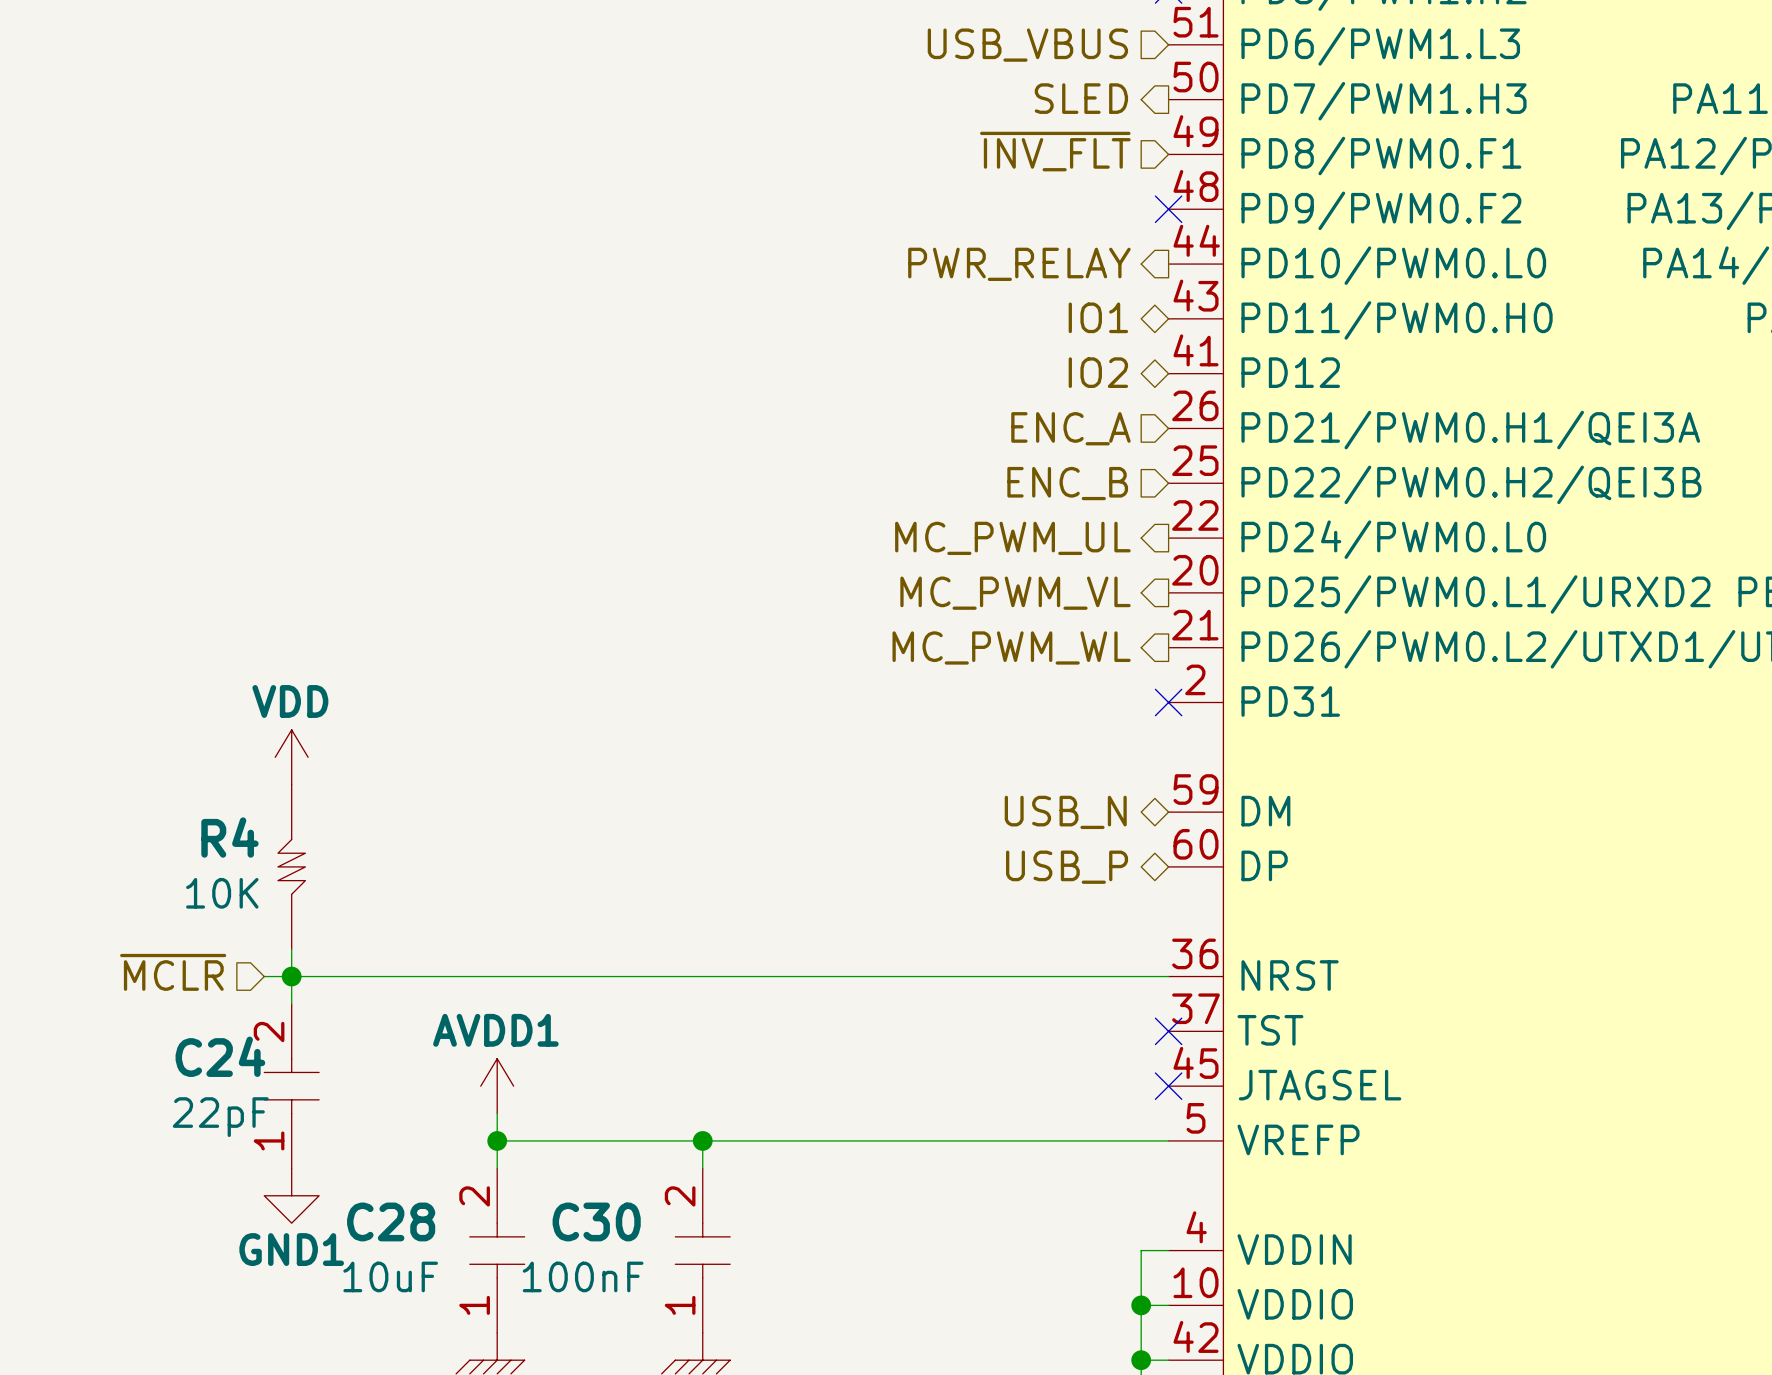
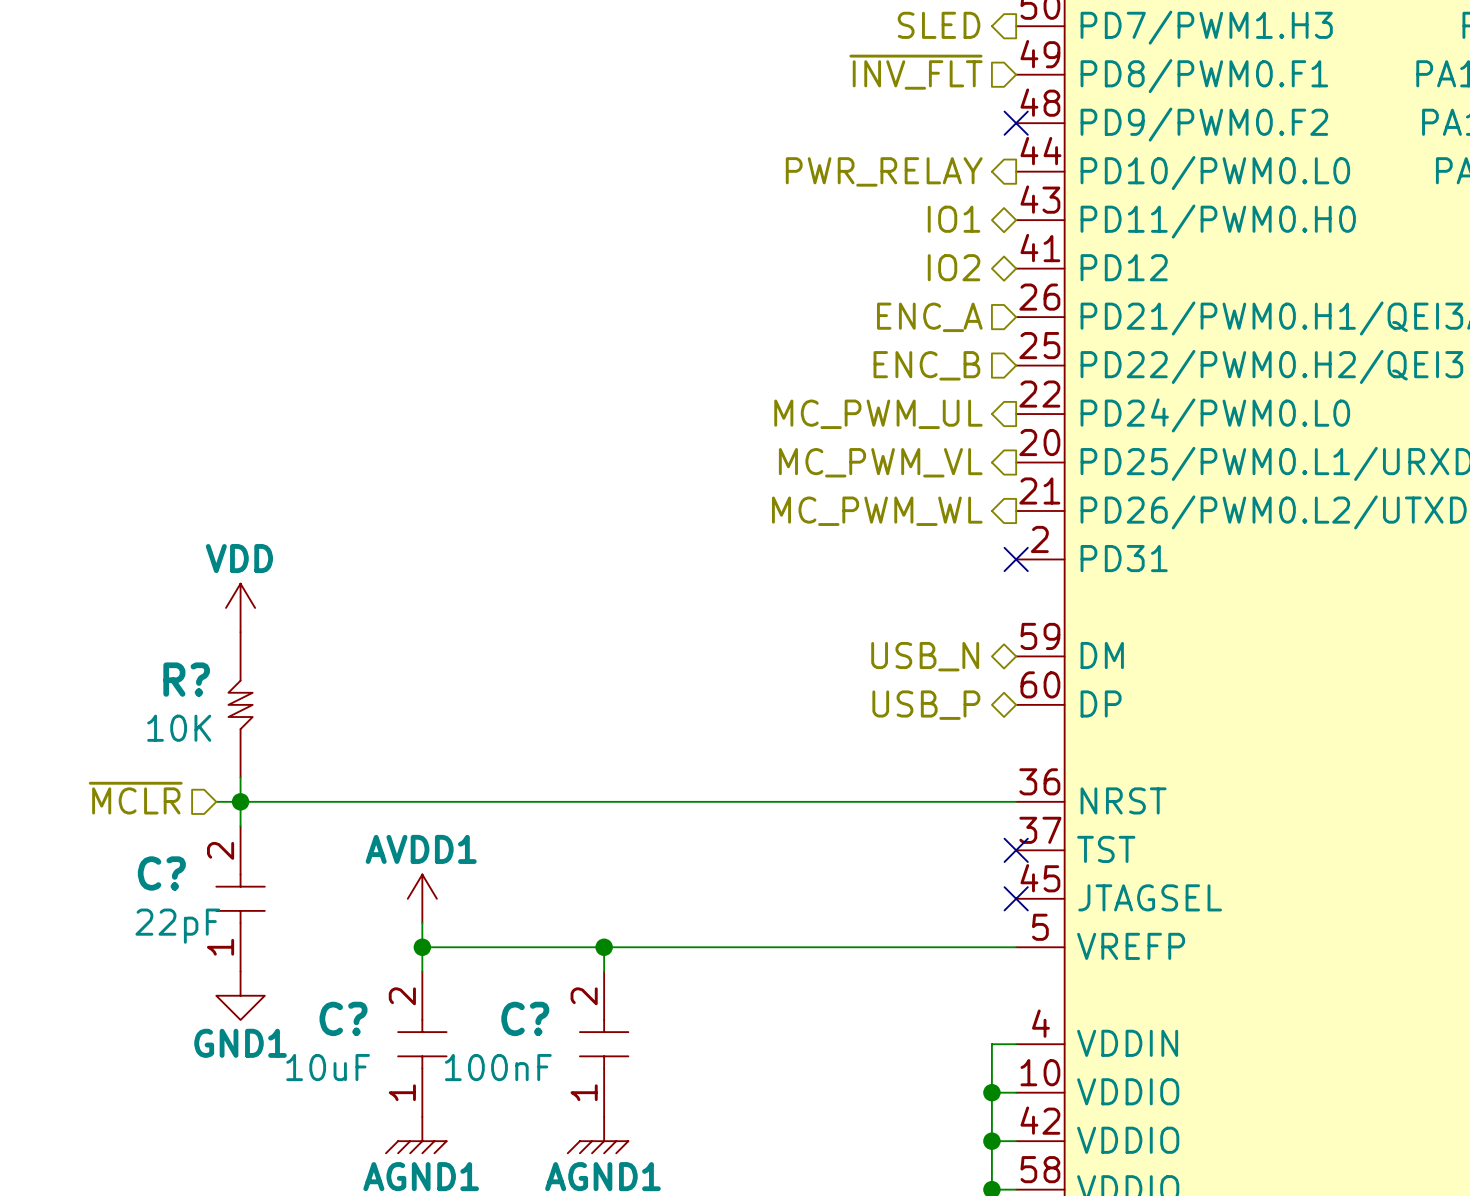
R4 name: R4 (229, 837) -> R? (186, 679)
C24 name: C24 (220, 1056) -> C? (161, 873)
C28 name: C28 (391, 1221) -> C? (343, 1018)
C30 name: C30 (596, 1221) -> C? (525, 1018)

